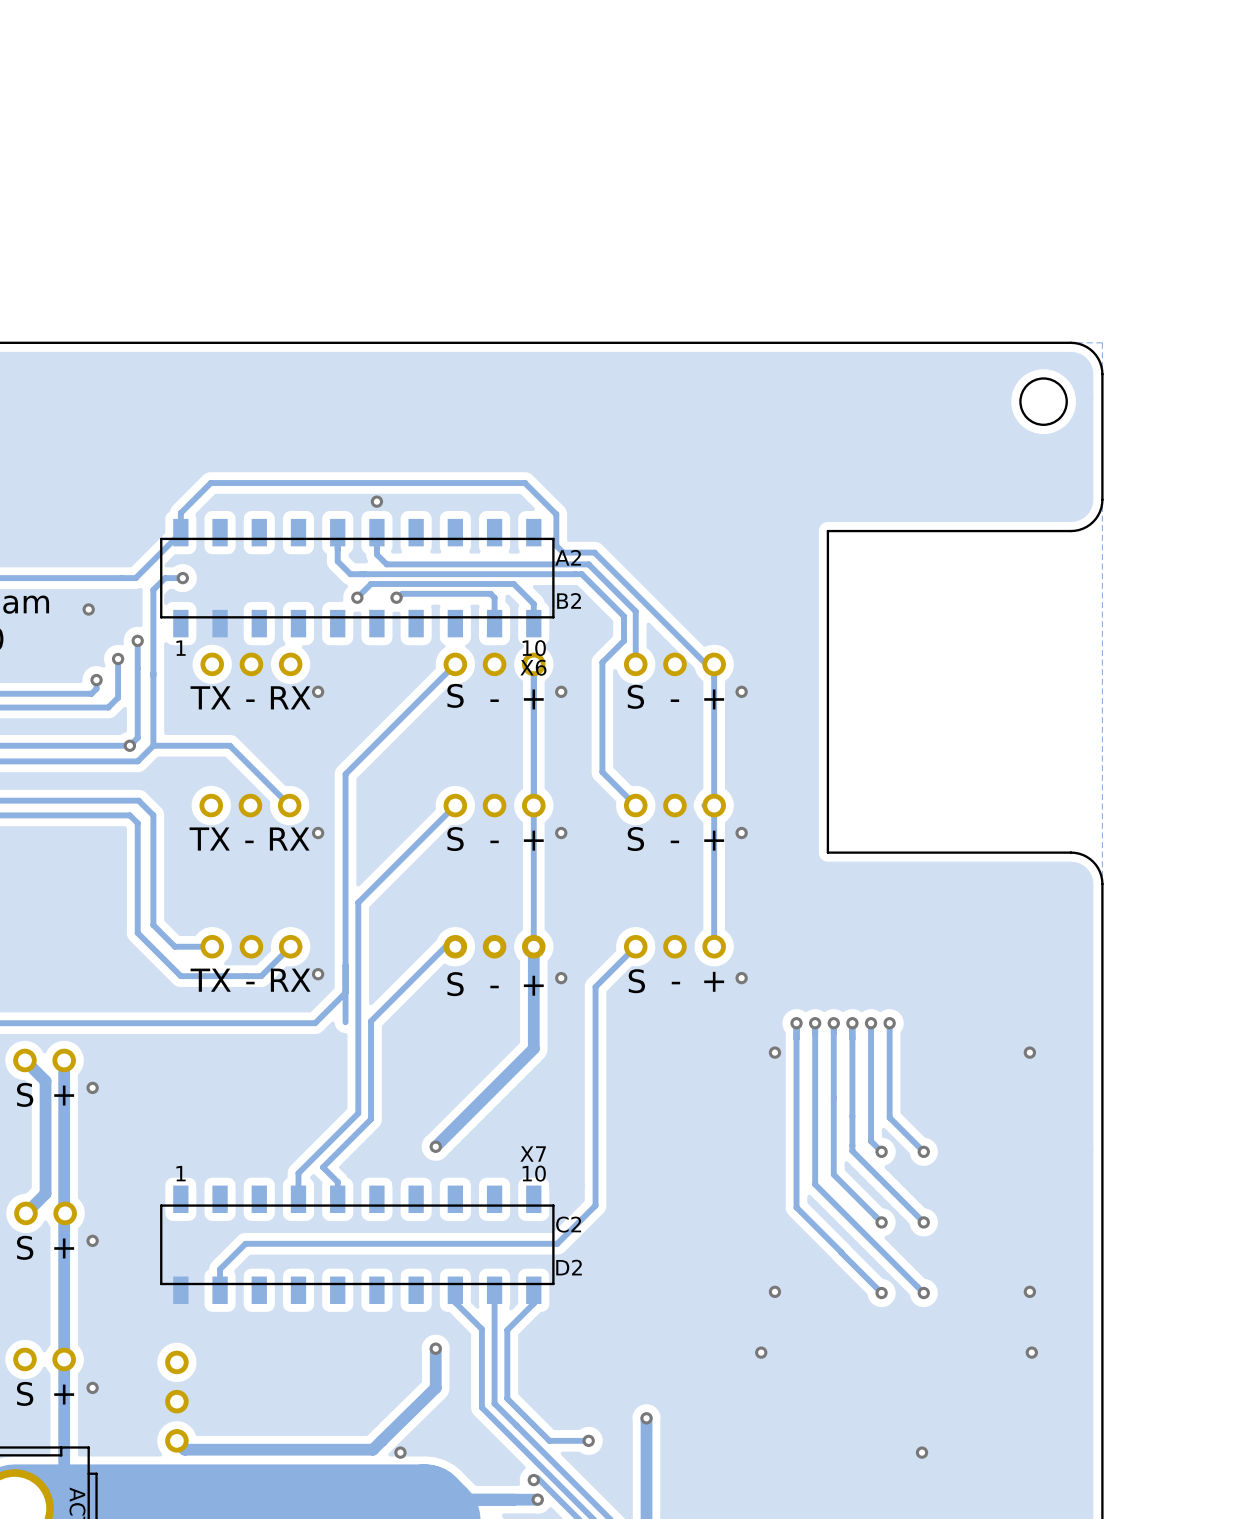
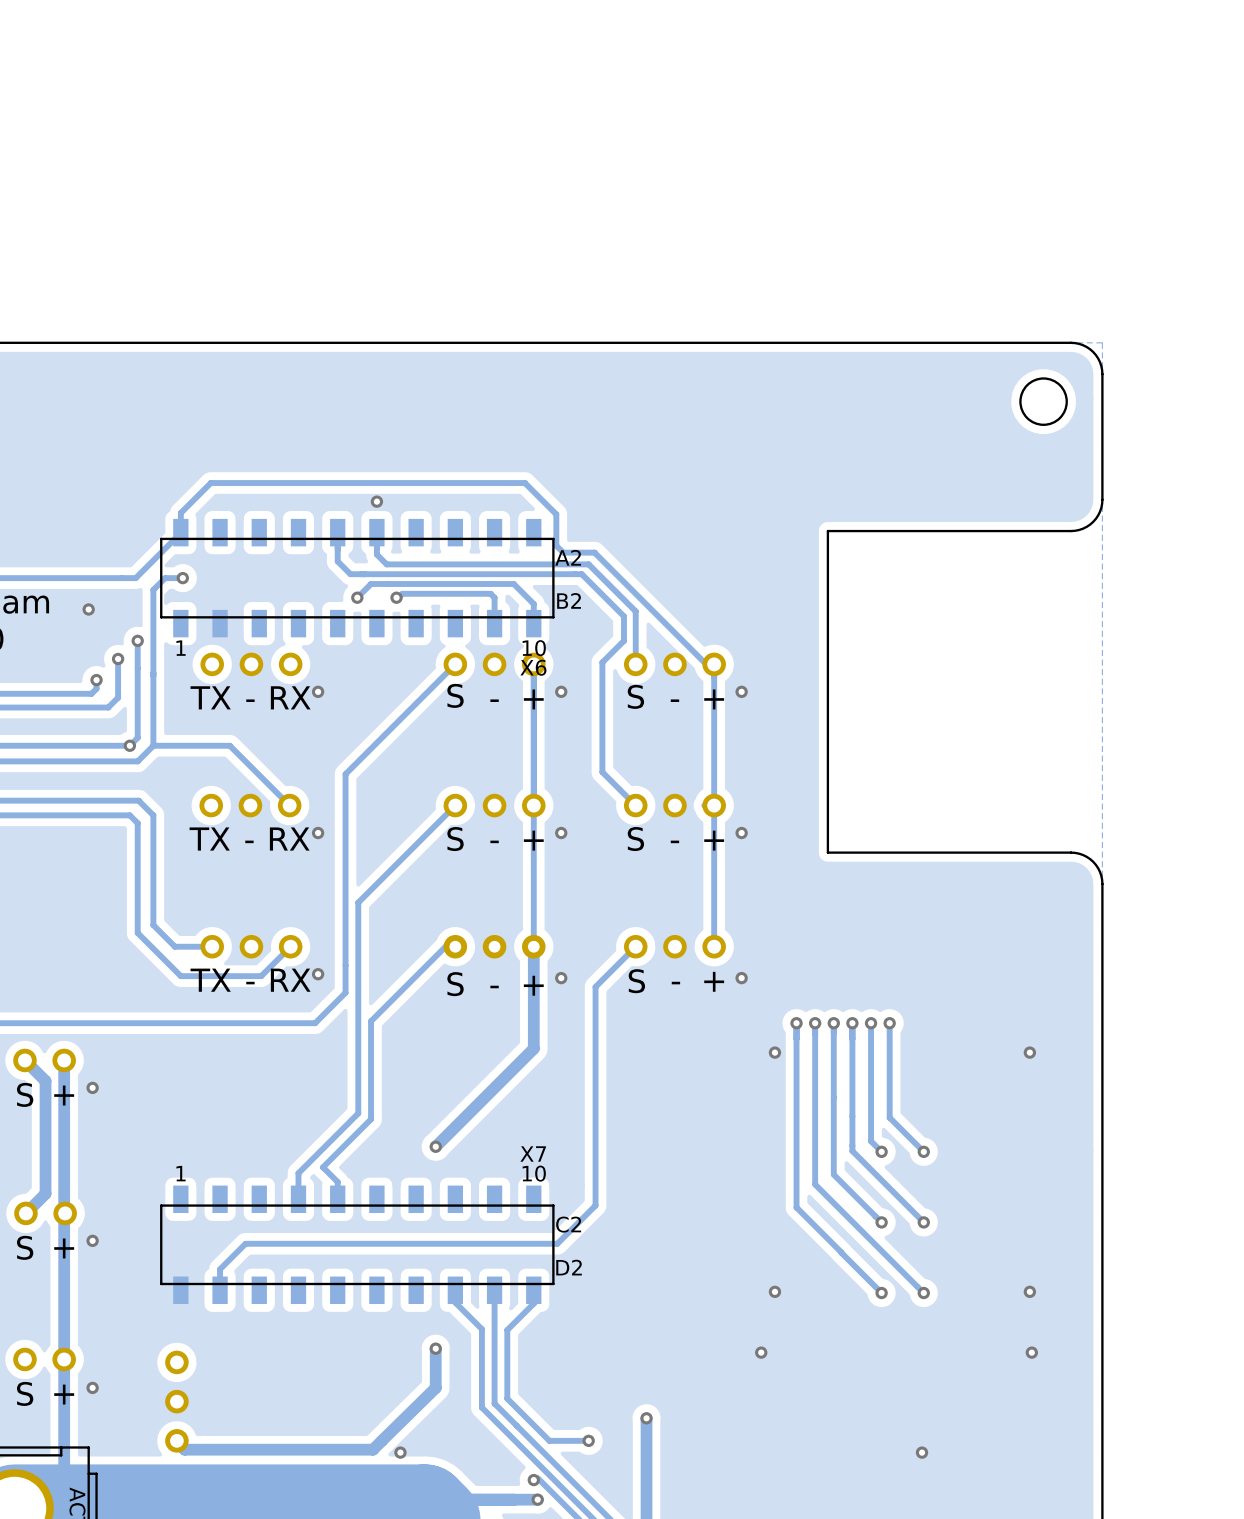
track: (345, 992) (345, 1022) -> none

